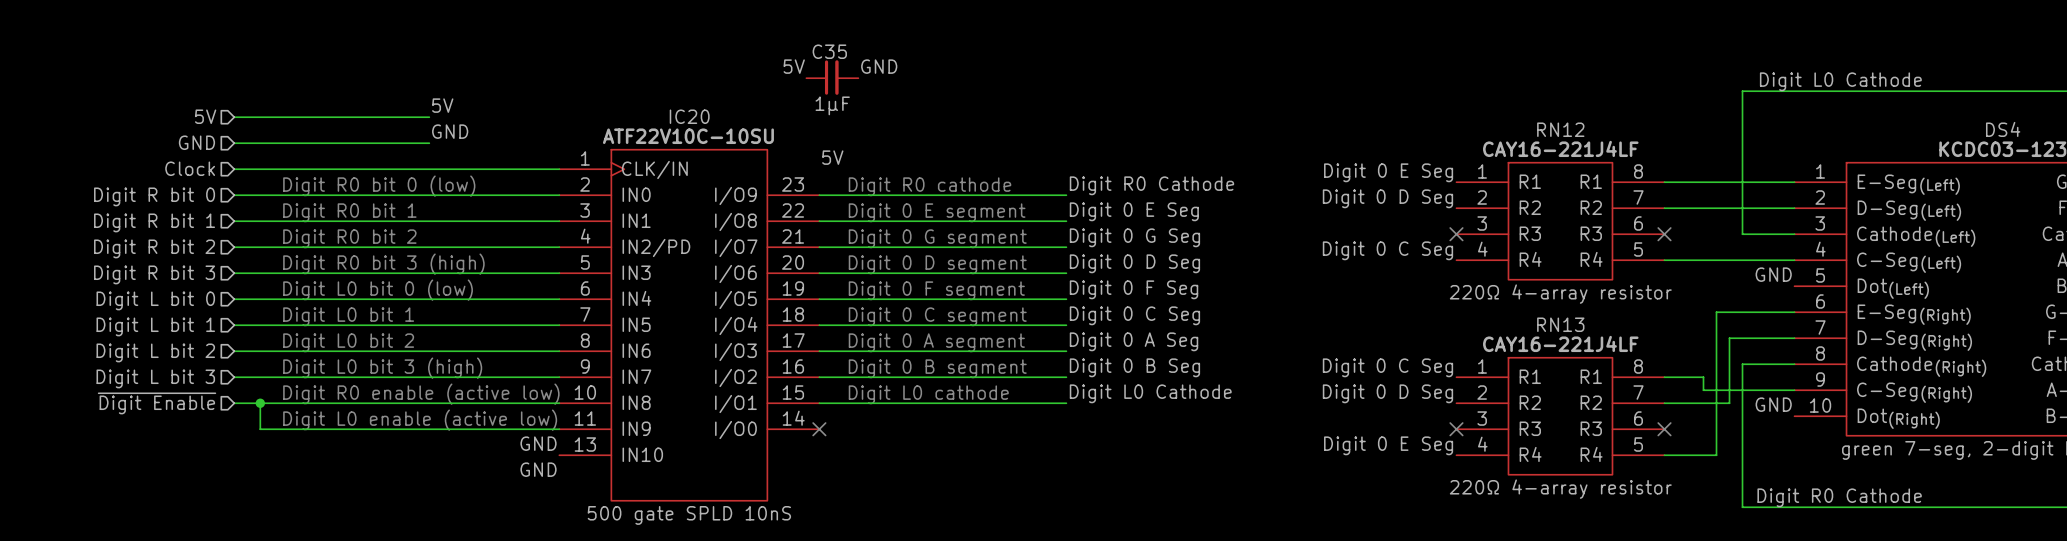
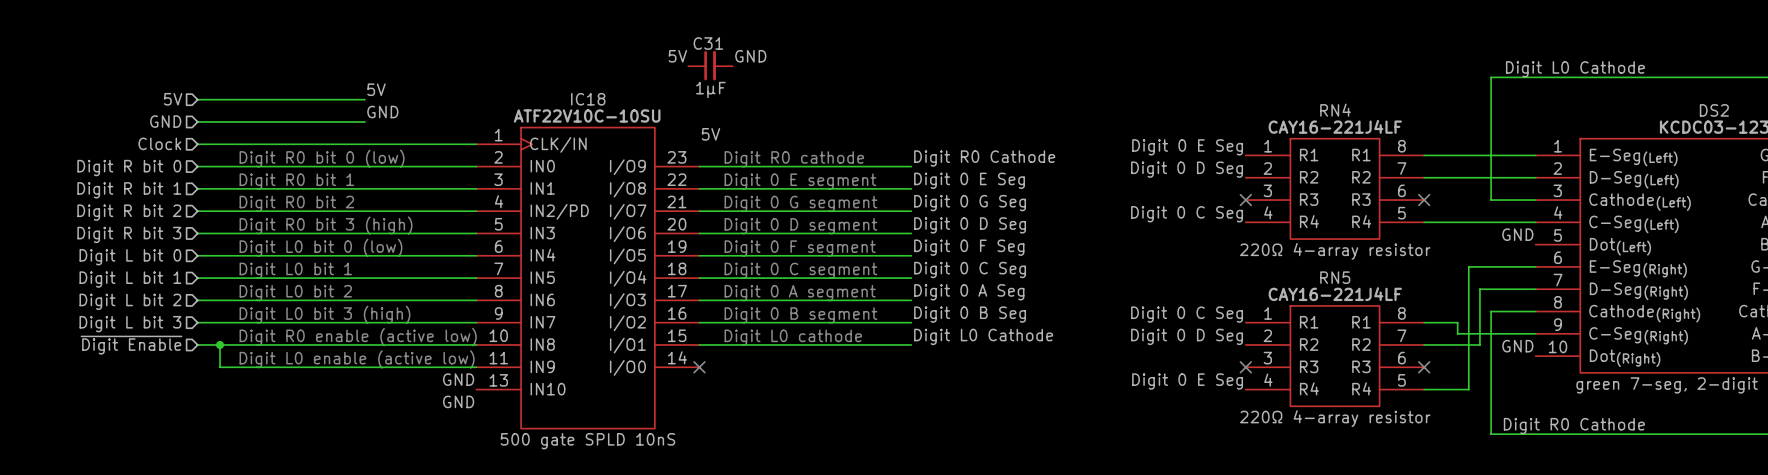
C35 name: C35 (829, 51) -> C31 (708, 43)
IC20 name: IC20 (689, 116) -> IC18 (588, 99)
RN12 name: RN12 (1560, 129) -> RN4 (1335, 110)
DS4 name: DS4 (2003, 129) -> DS2 (1714, 110)
RN13 name: RN13 (1560, 324) -> RN5 (1335, 277)

